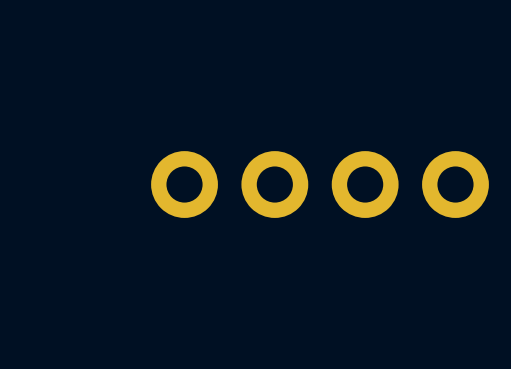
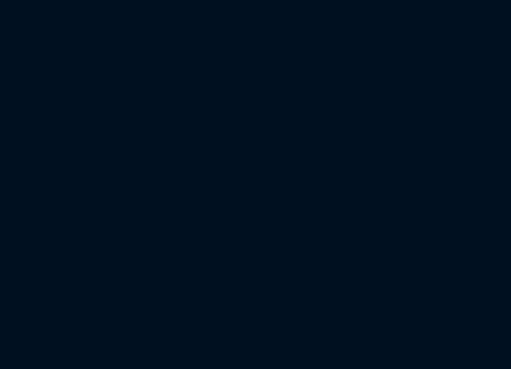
part: (320, 184) -> none

